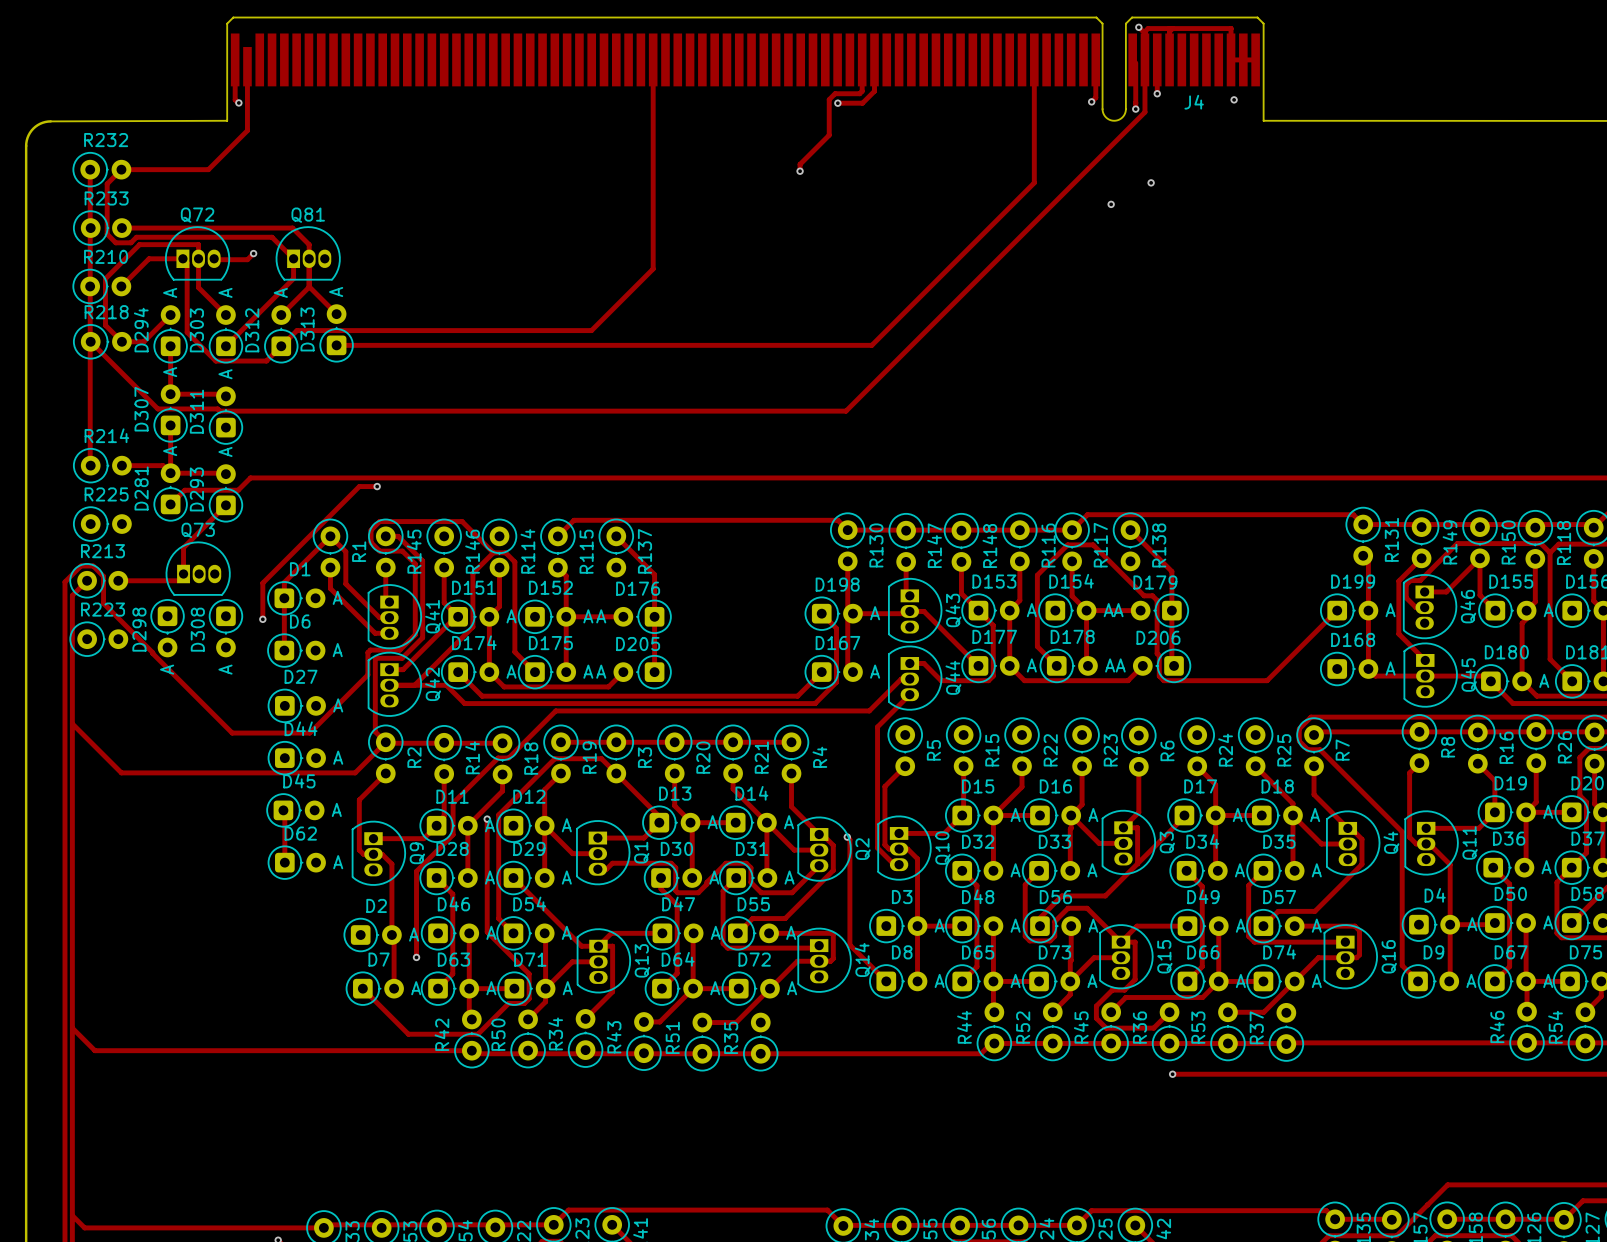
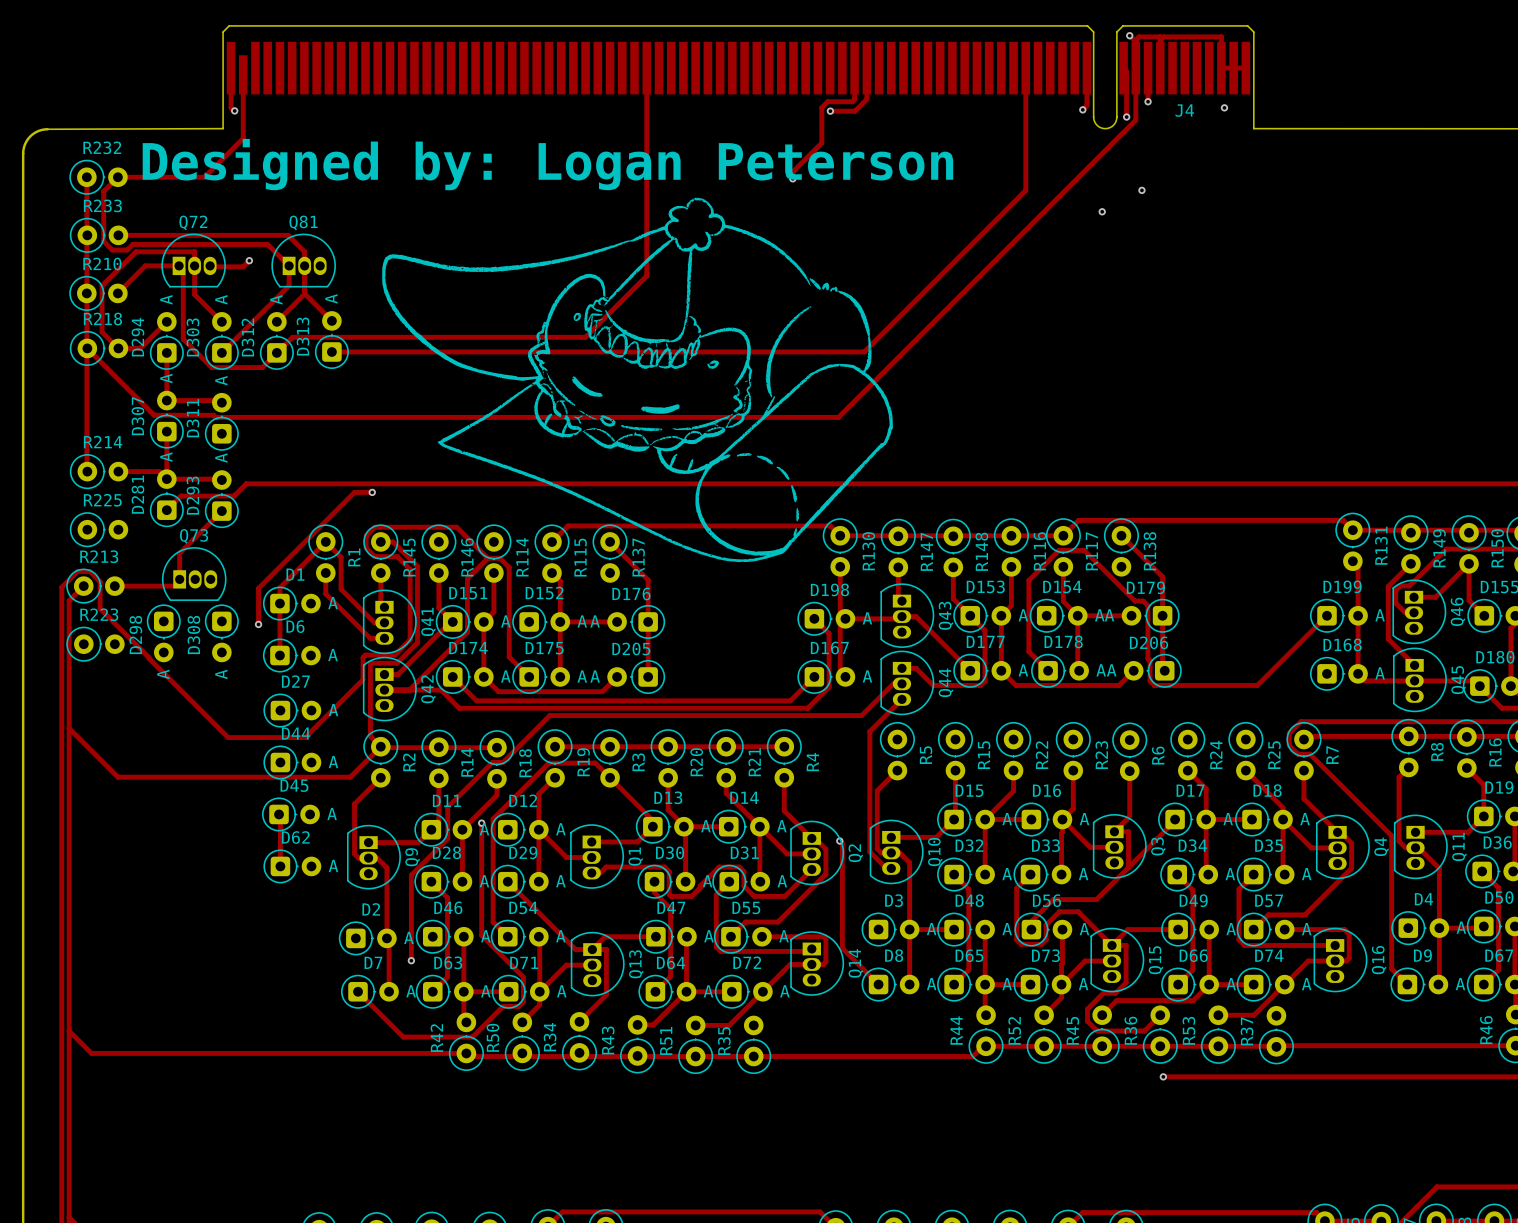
text: none -> Designed by: Logan Peterson (547, 164)
drawing: none -> [382, 197, 893, 563]

